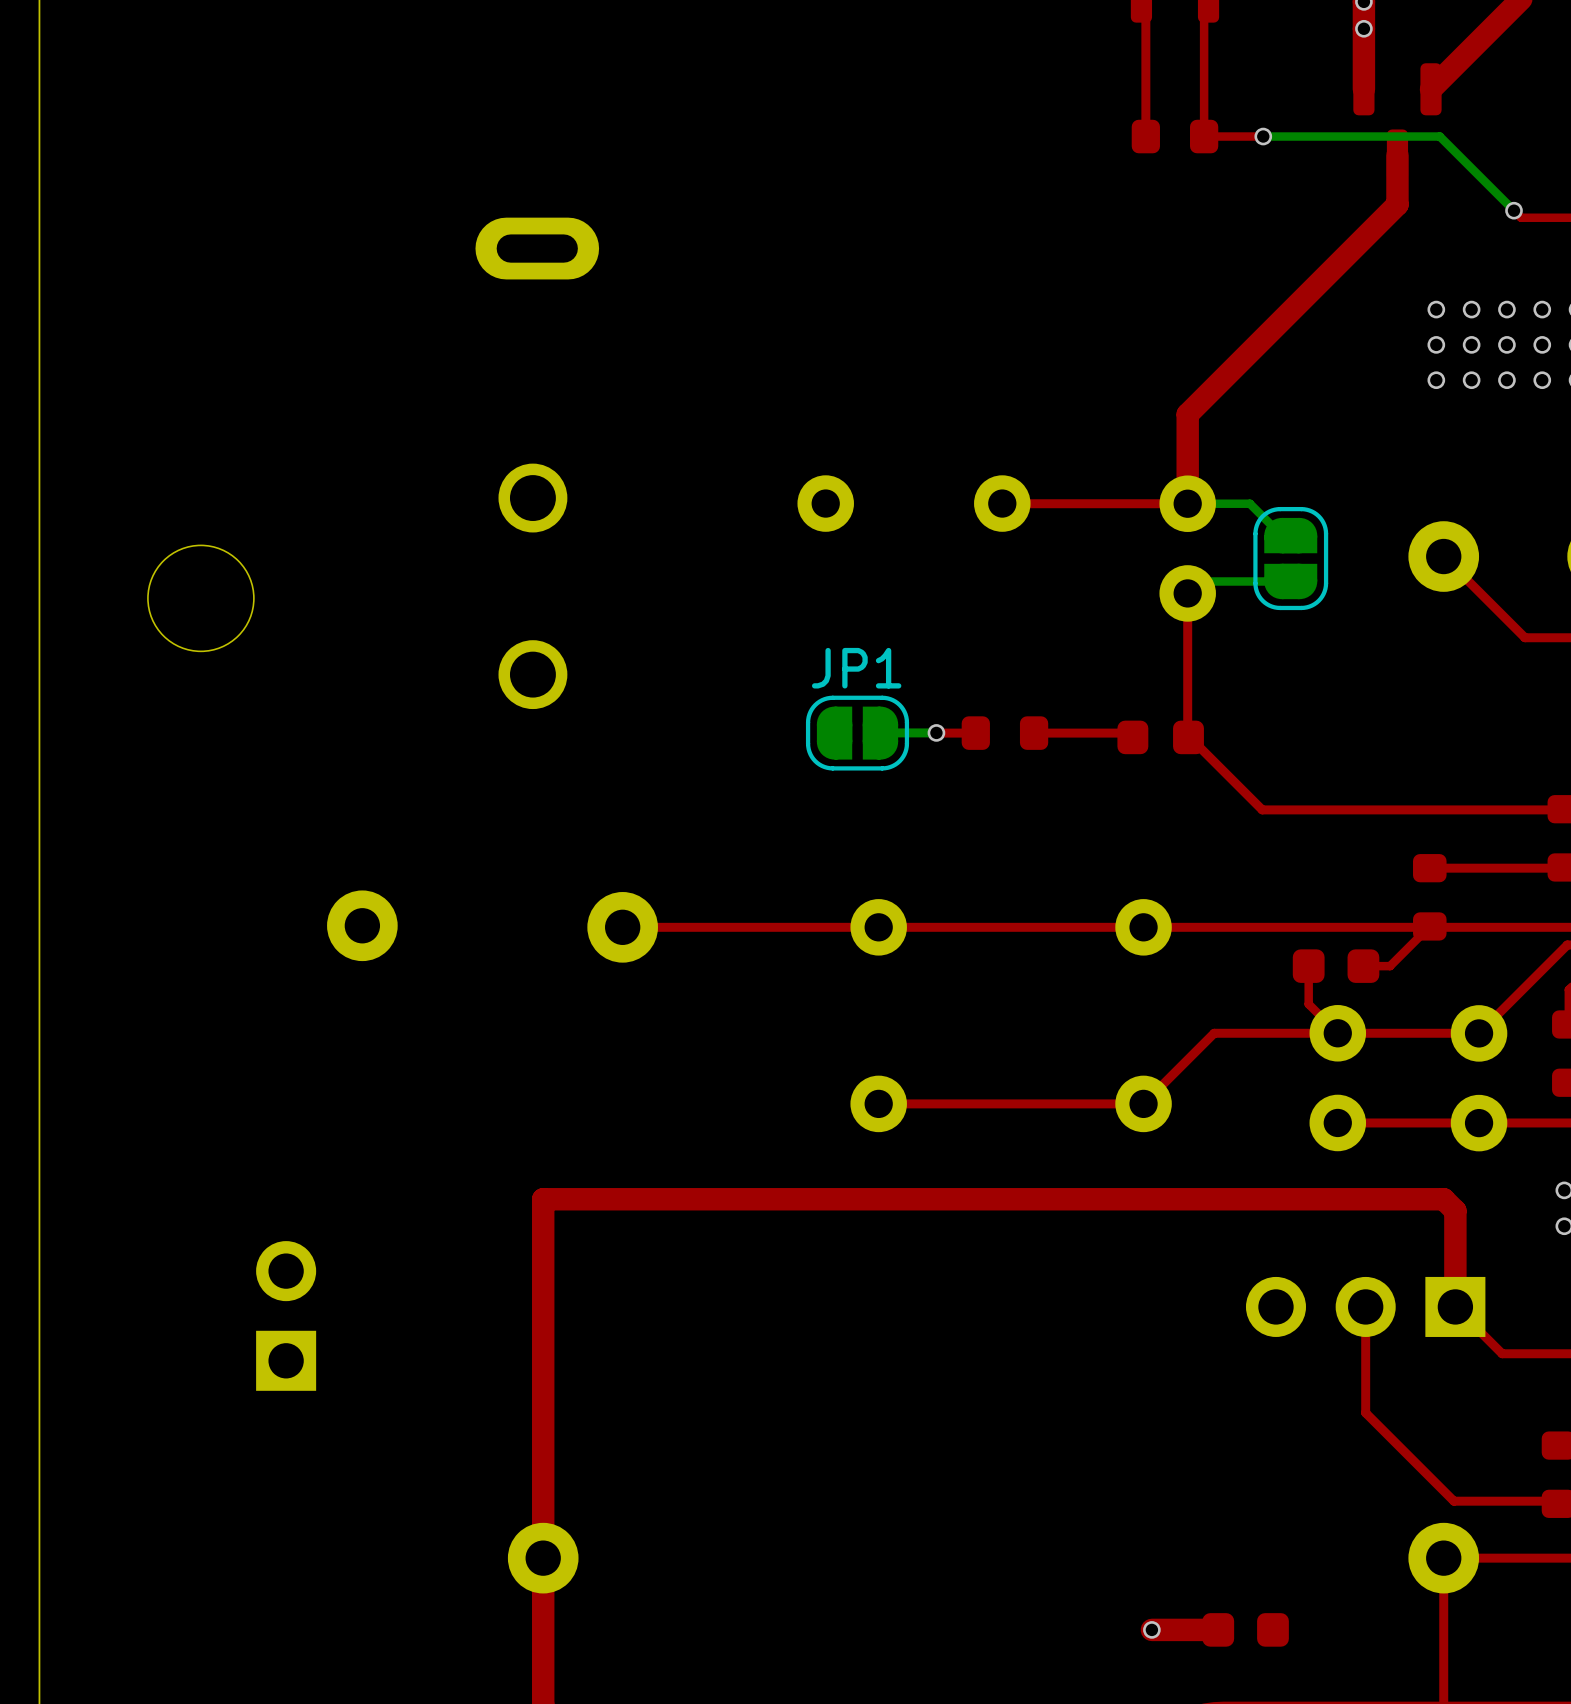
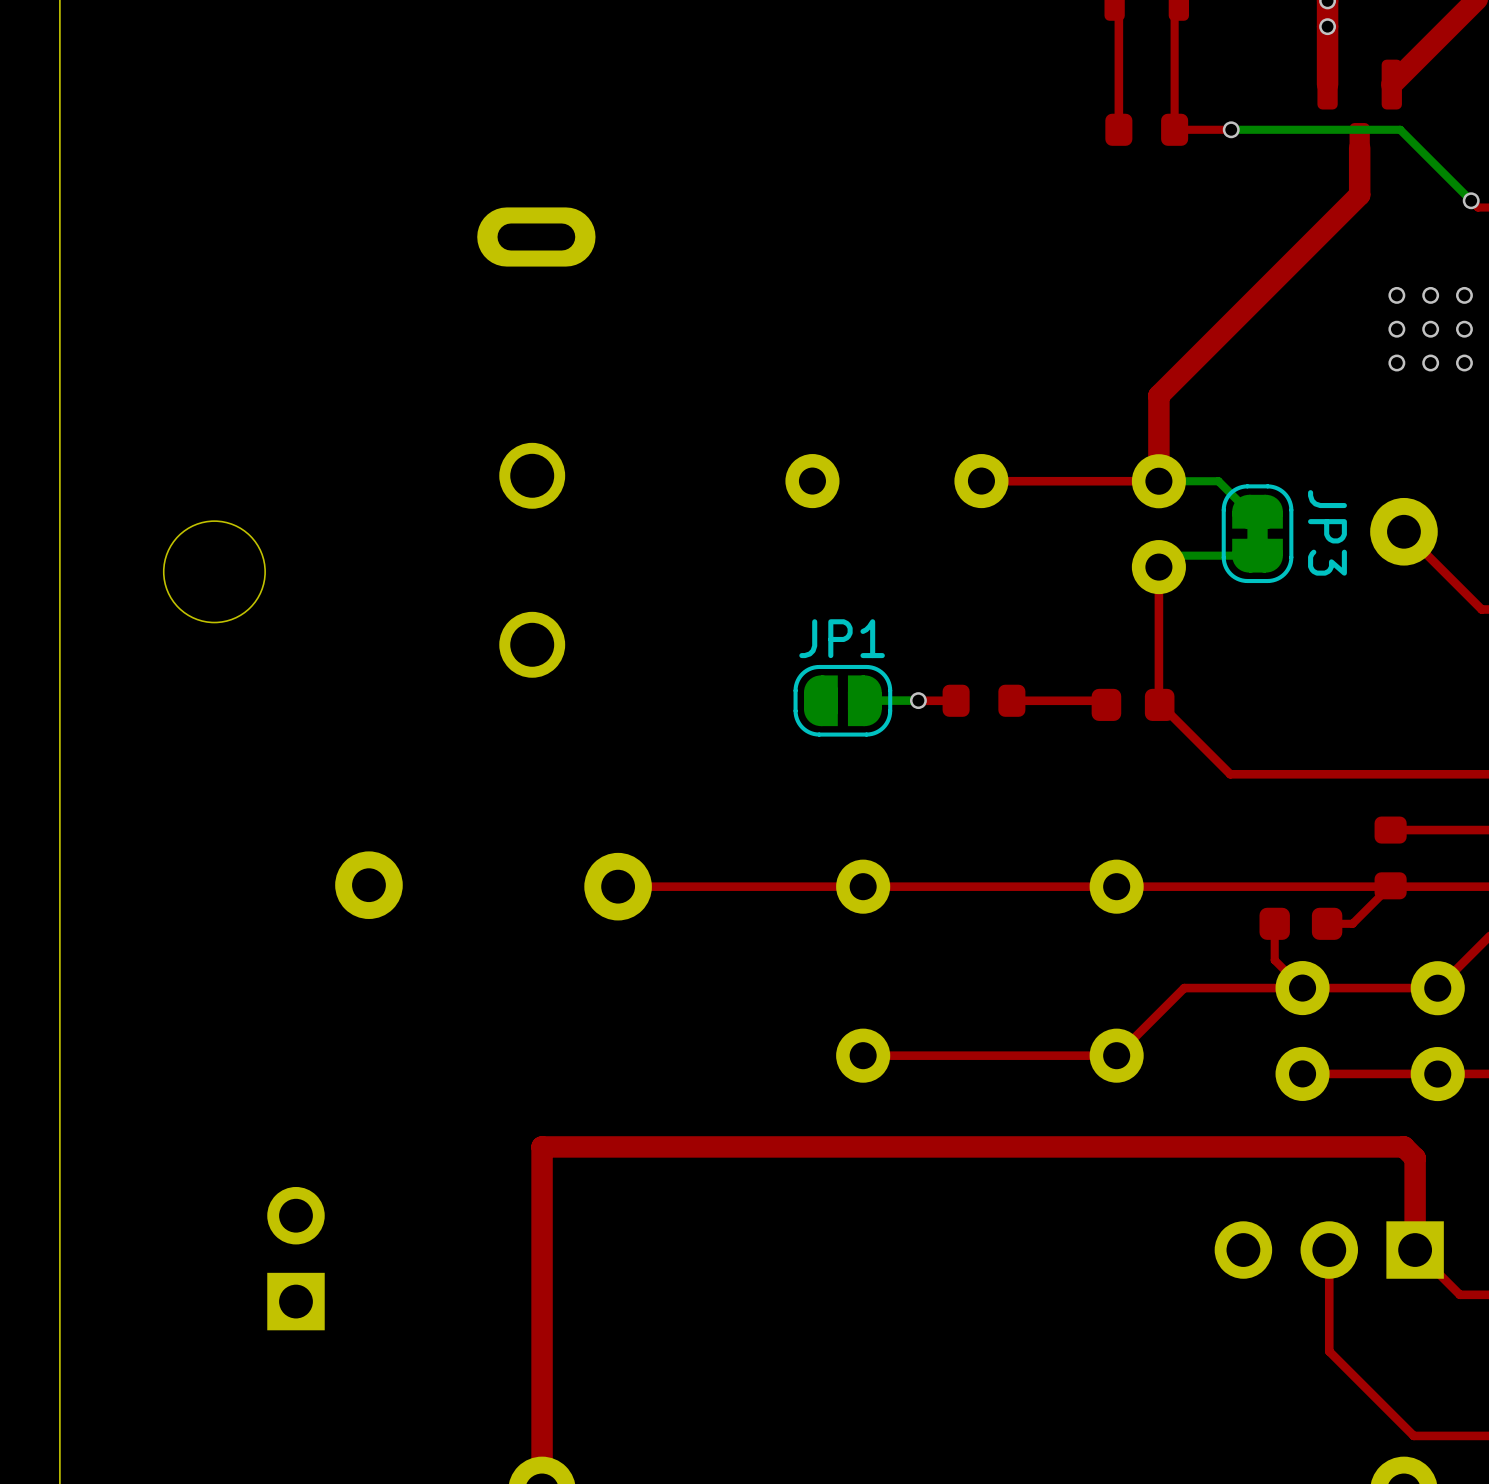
part: (1290, 558) -> none
JP3: none -> (1257, 533)

